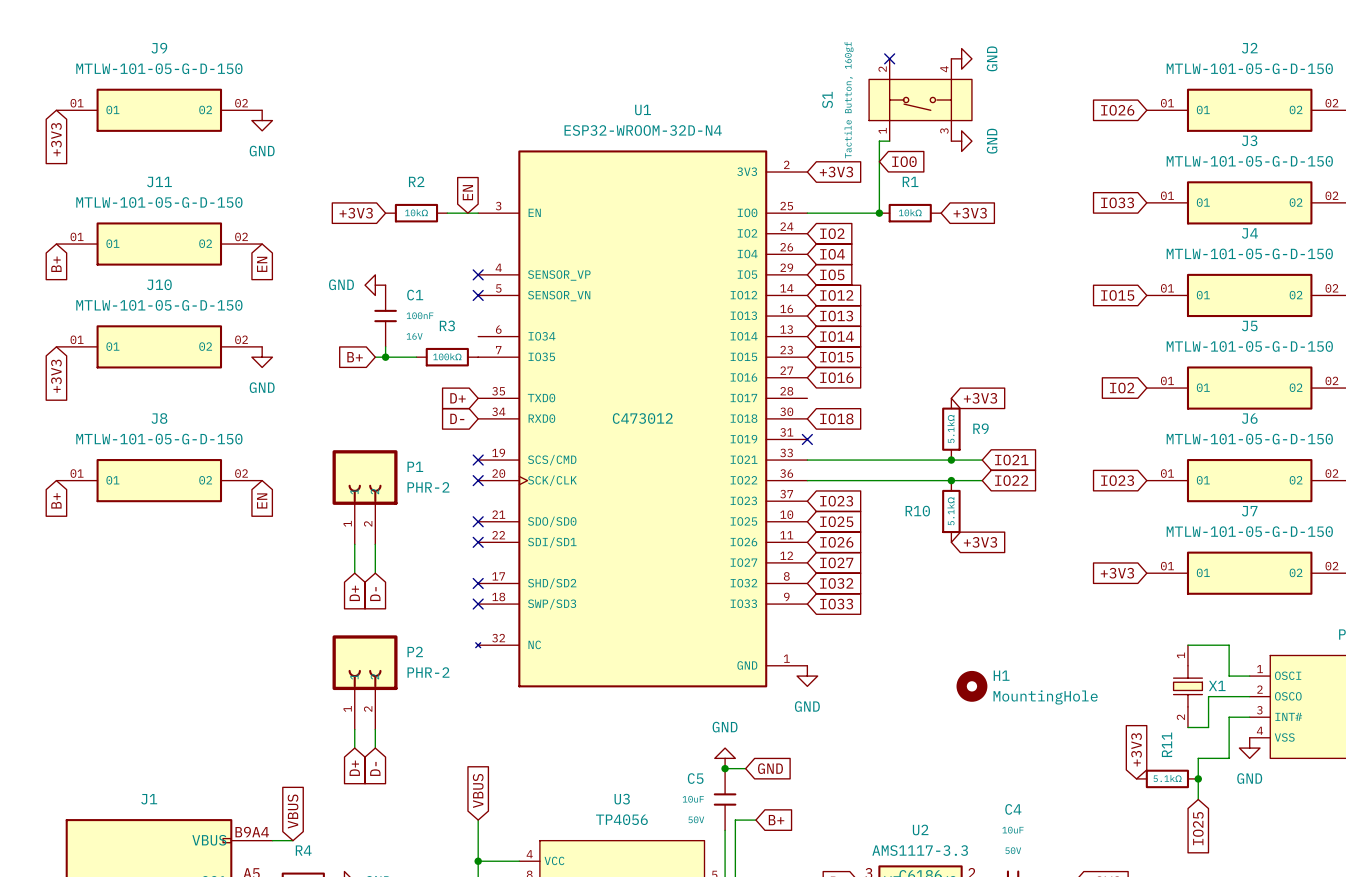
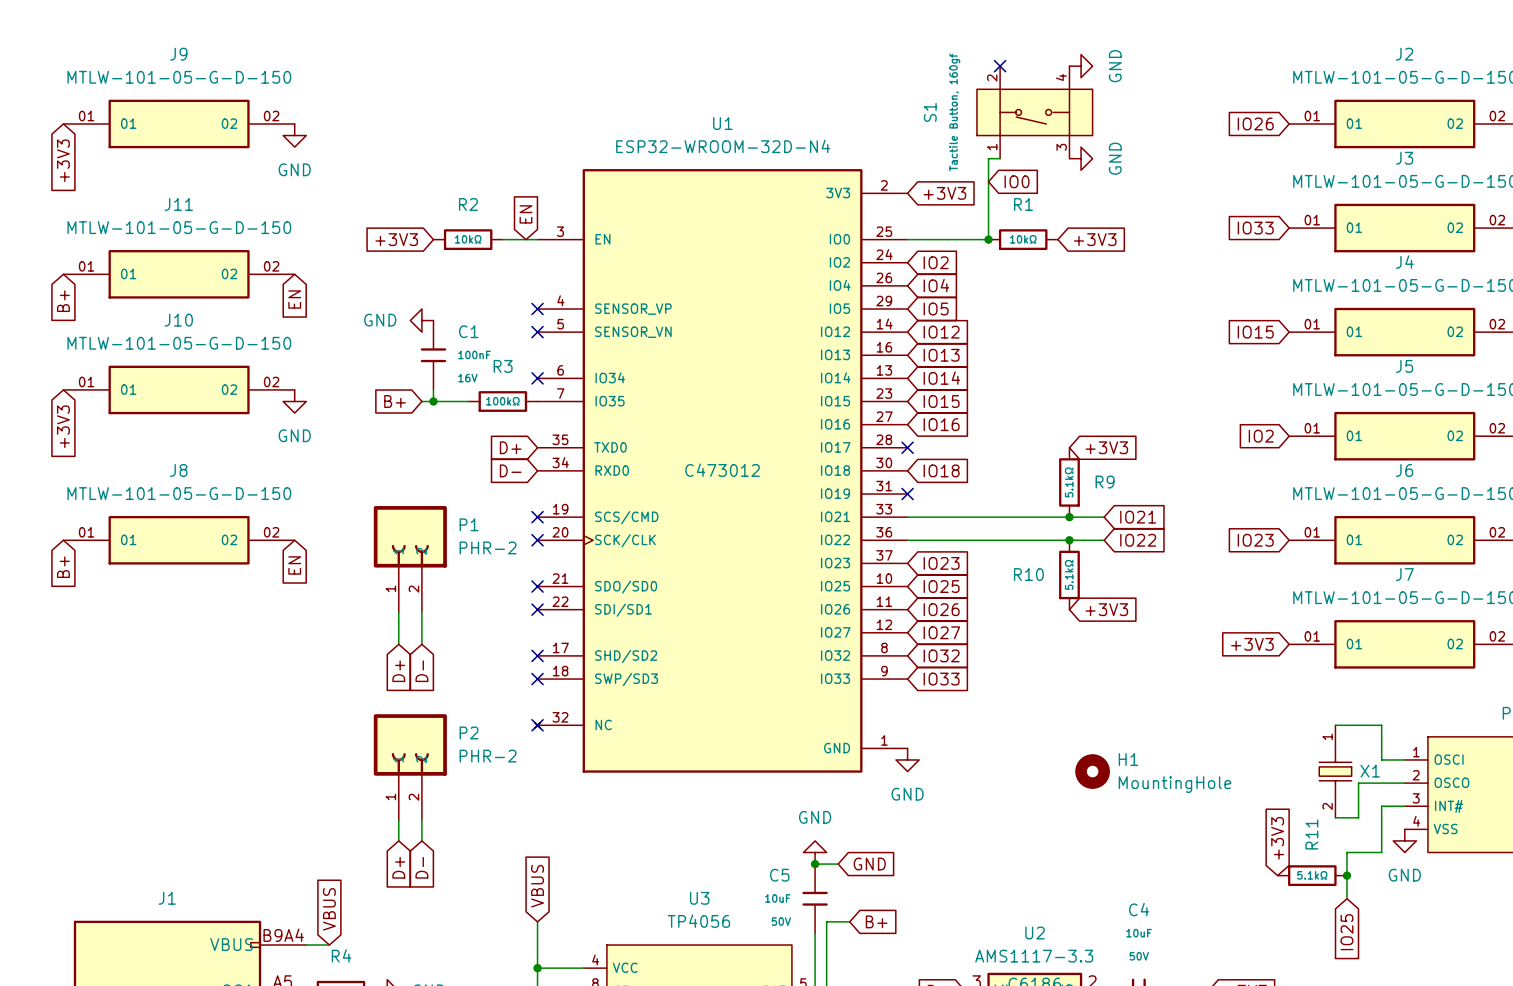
no-connect mark: none -> (537, 378)
no-connect mark: none -> (907, 447)
no-connect mark: none -> (537, 725)

